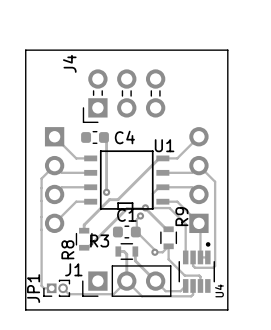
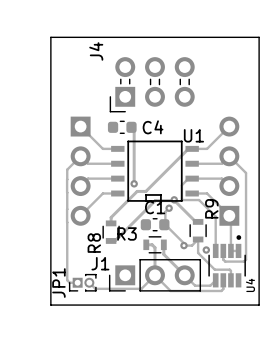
via: none -> (206, 250)

